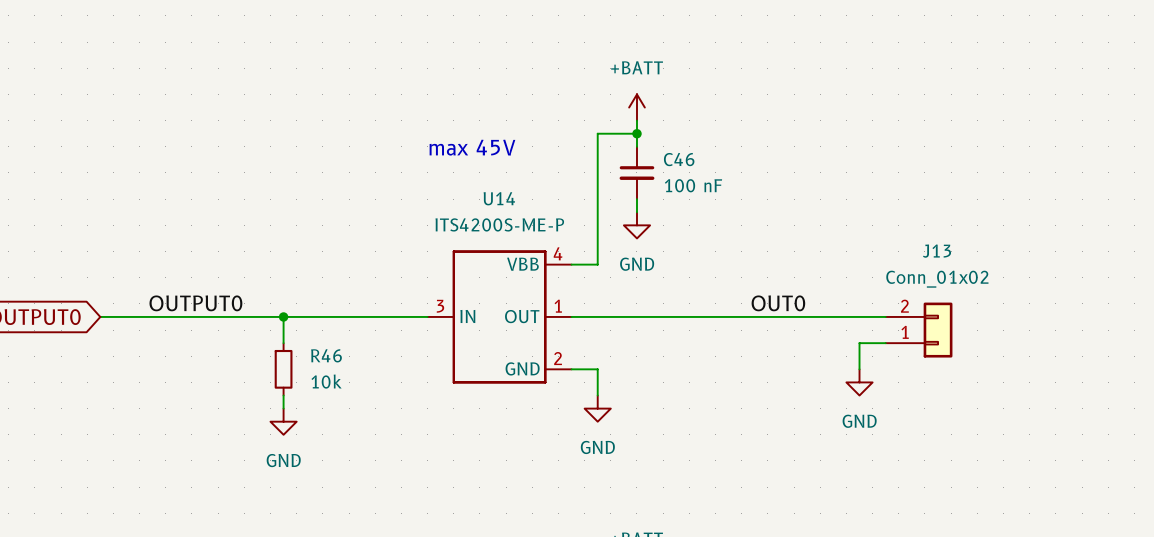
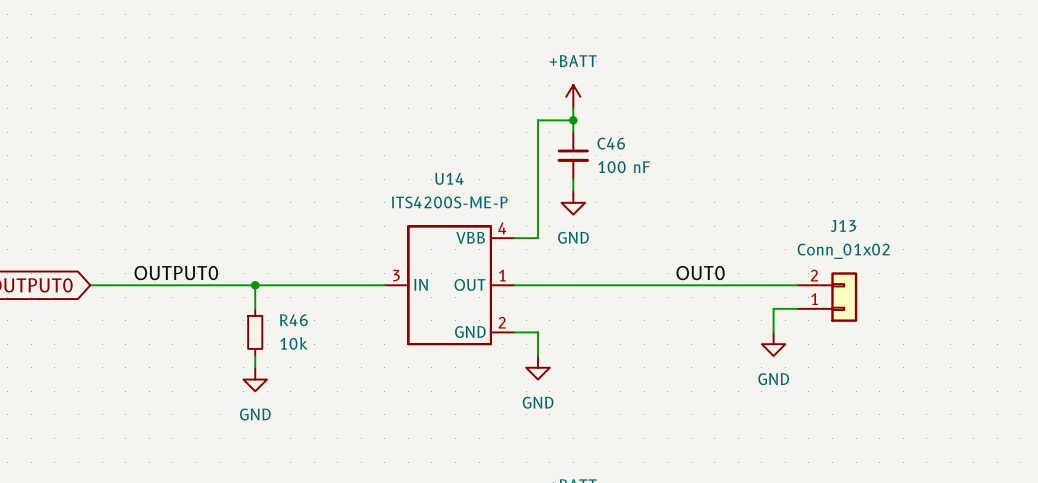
text: max 45V (472, 147) -> none

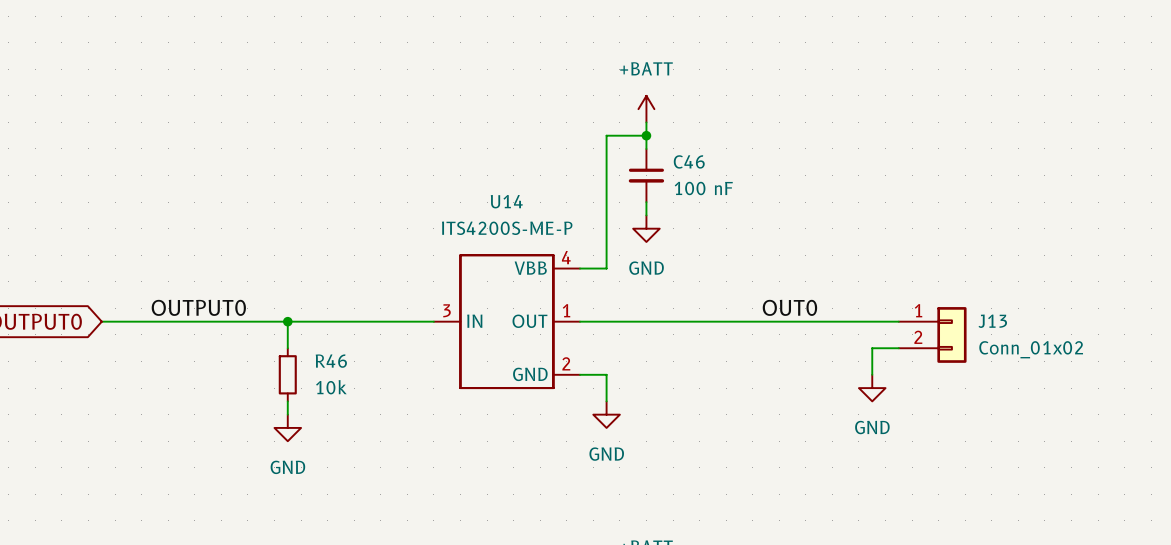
J13 name position: J13 (843, 226) -> J13 (992, 321)
J13 value position: Conn_01x02 (843, 251) -> Conn_01x02 (1031, 349)
J13 flip: as is (844, 297) -> up-down (951, 334)

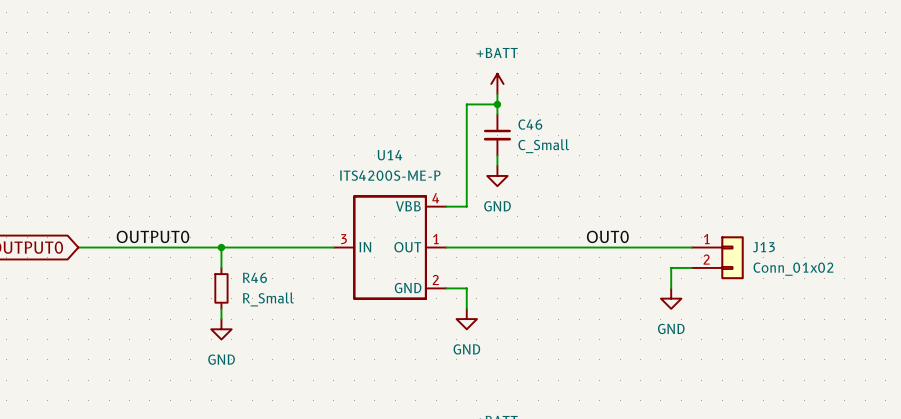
C46 value: 100 nF (703, 188) -> C_Small (543, 146)
R46 value: 10k (331, 387) -> R_Small (268, 299)

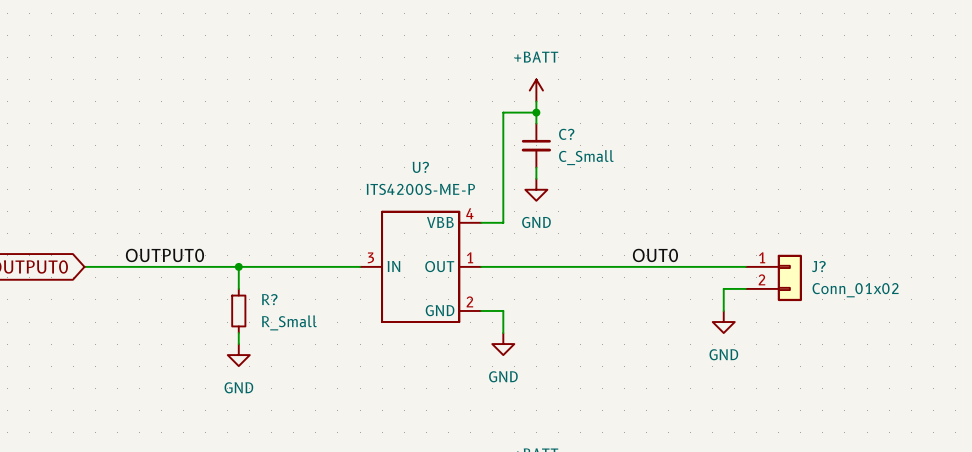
C46 name: C46 (530, 124) -> C? (566, 134)
U14 name: U14 (389, 155) -> U? (420, 167)
J13 name: J13 (763, 247) -> J? (818, 266)
R46 name: R46 (254, 277) -> R? (269, 299)

